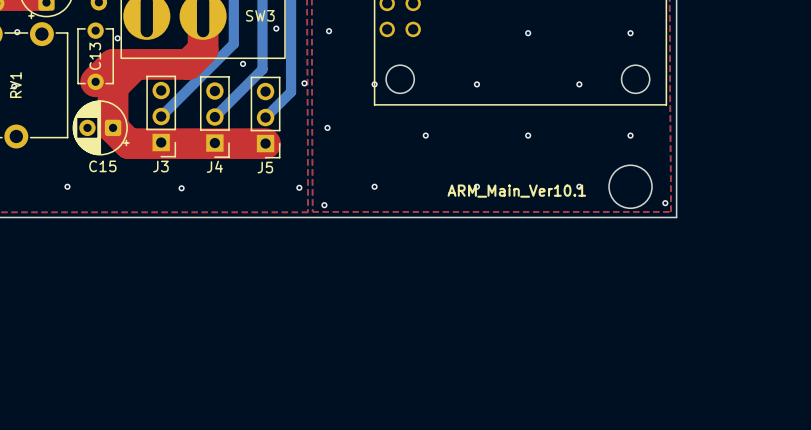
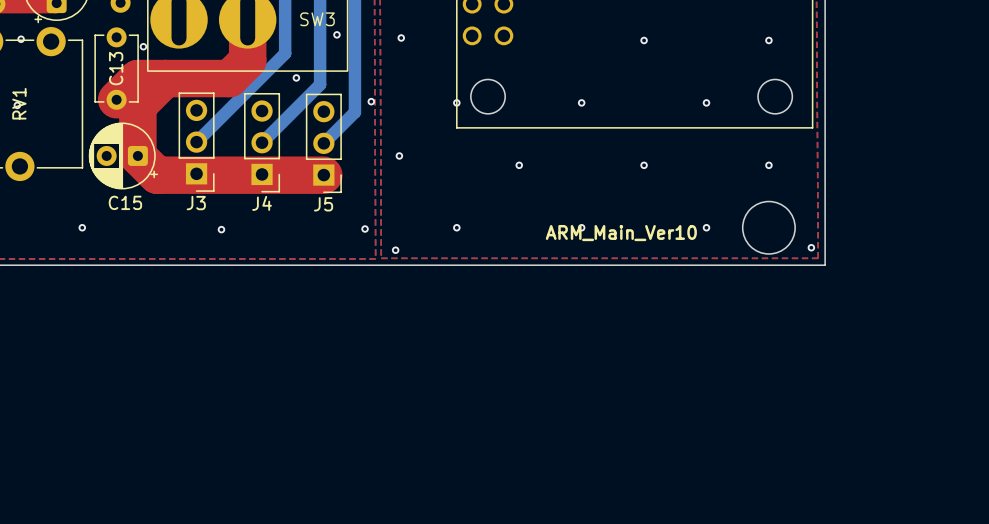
text: ARM_Main_Ver10.1 (516, 191) -> ARM_Main_Ver10 (621, 233)

